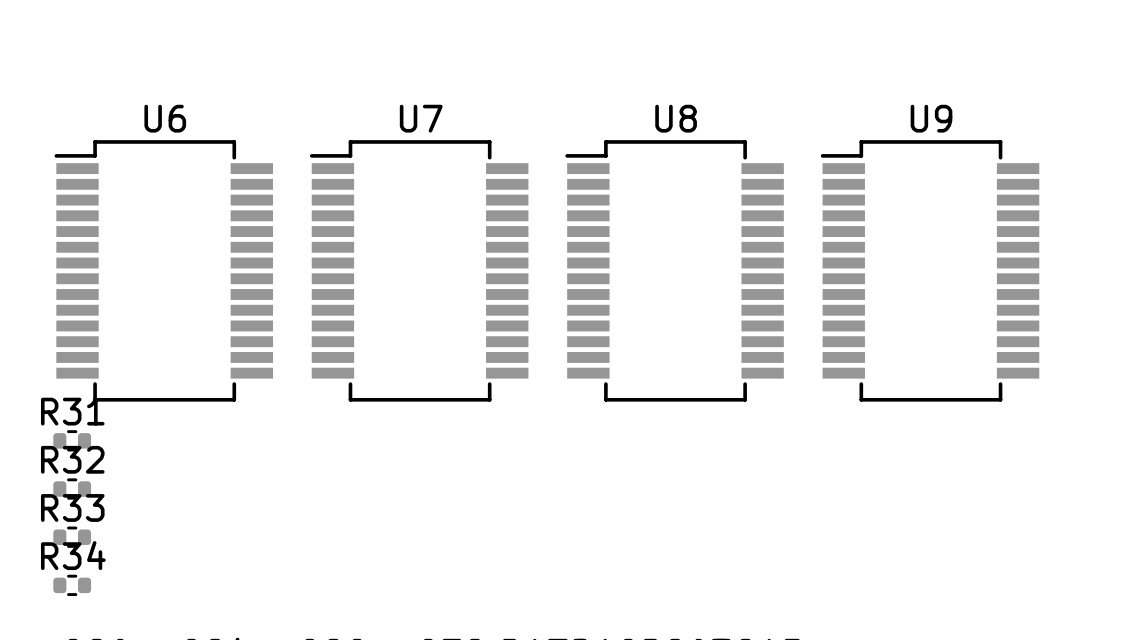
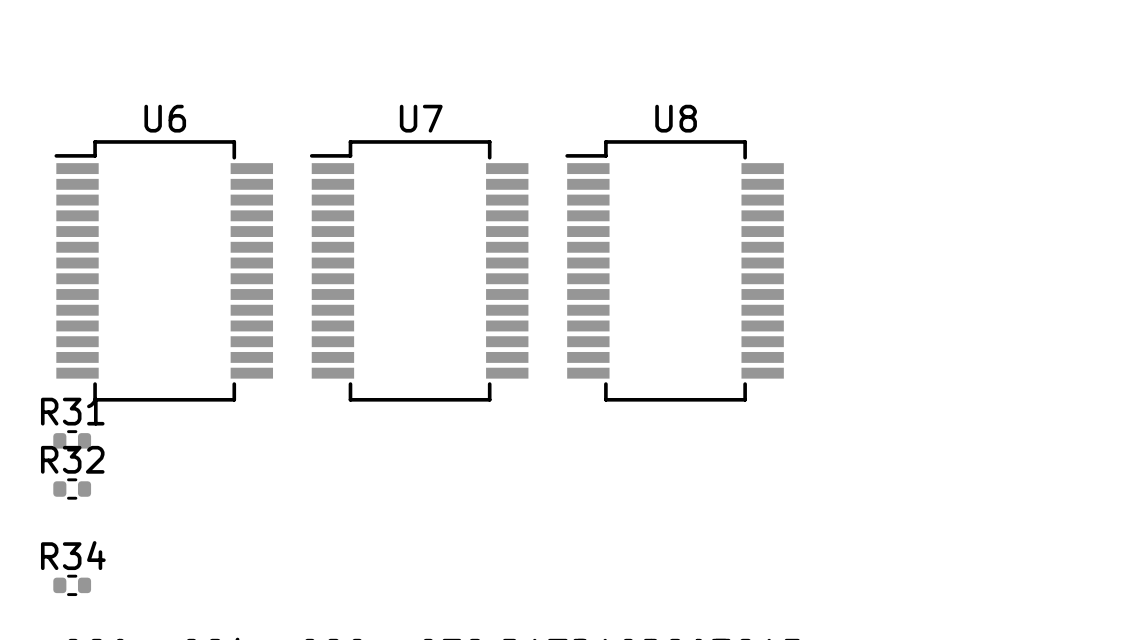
U9: (930, 270) -> none
R33: (72, 537) -> none

